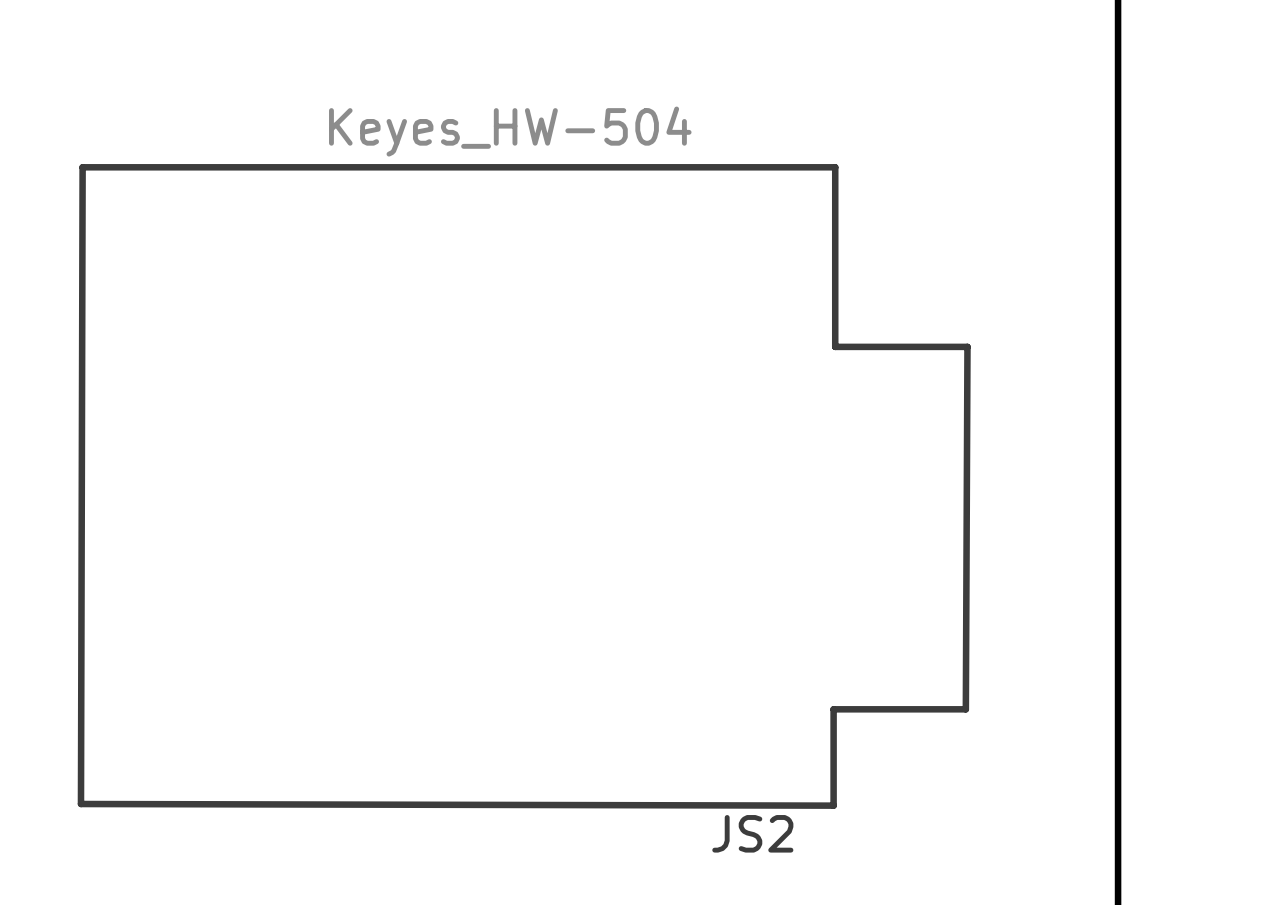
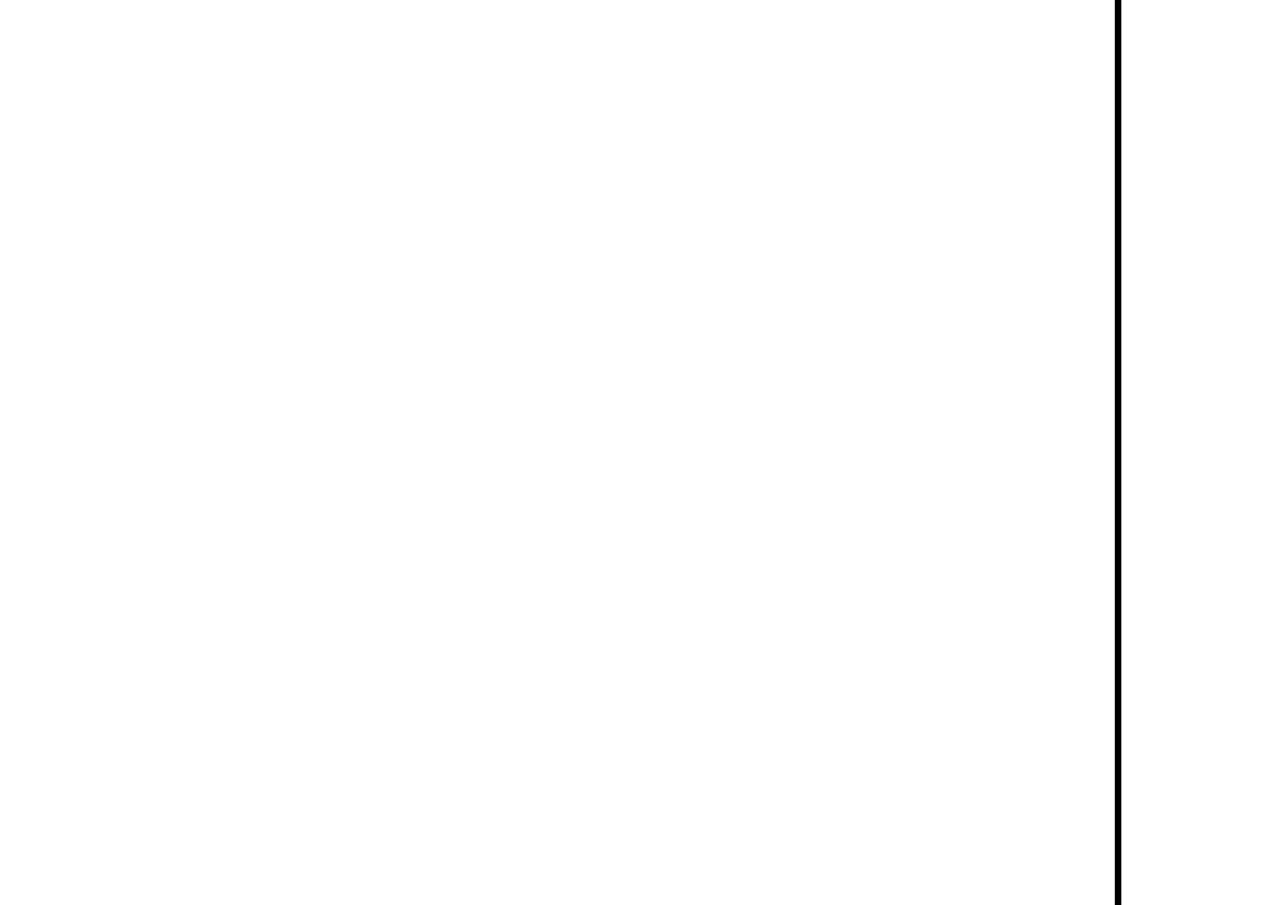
JS2: Keyes_HW-504 (524, 486) -> none

